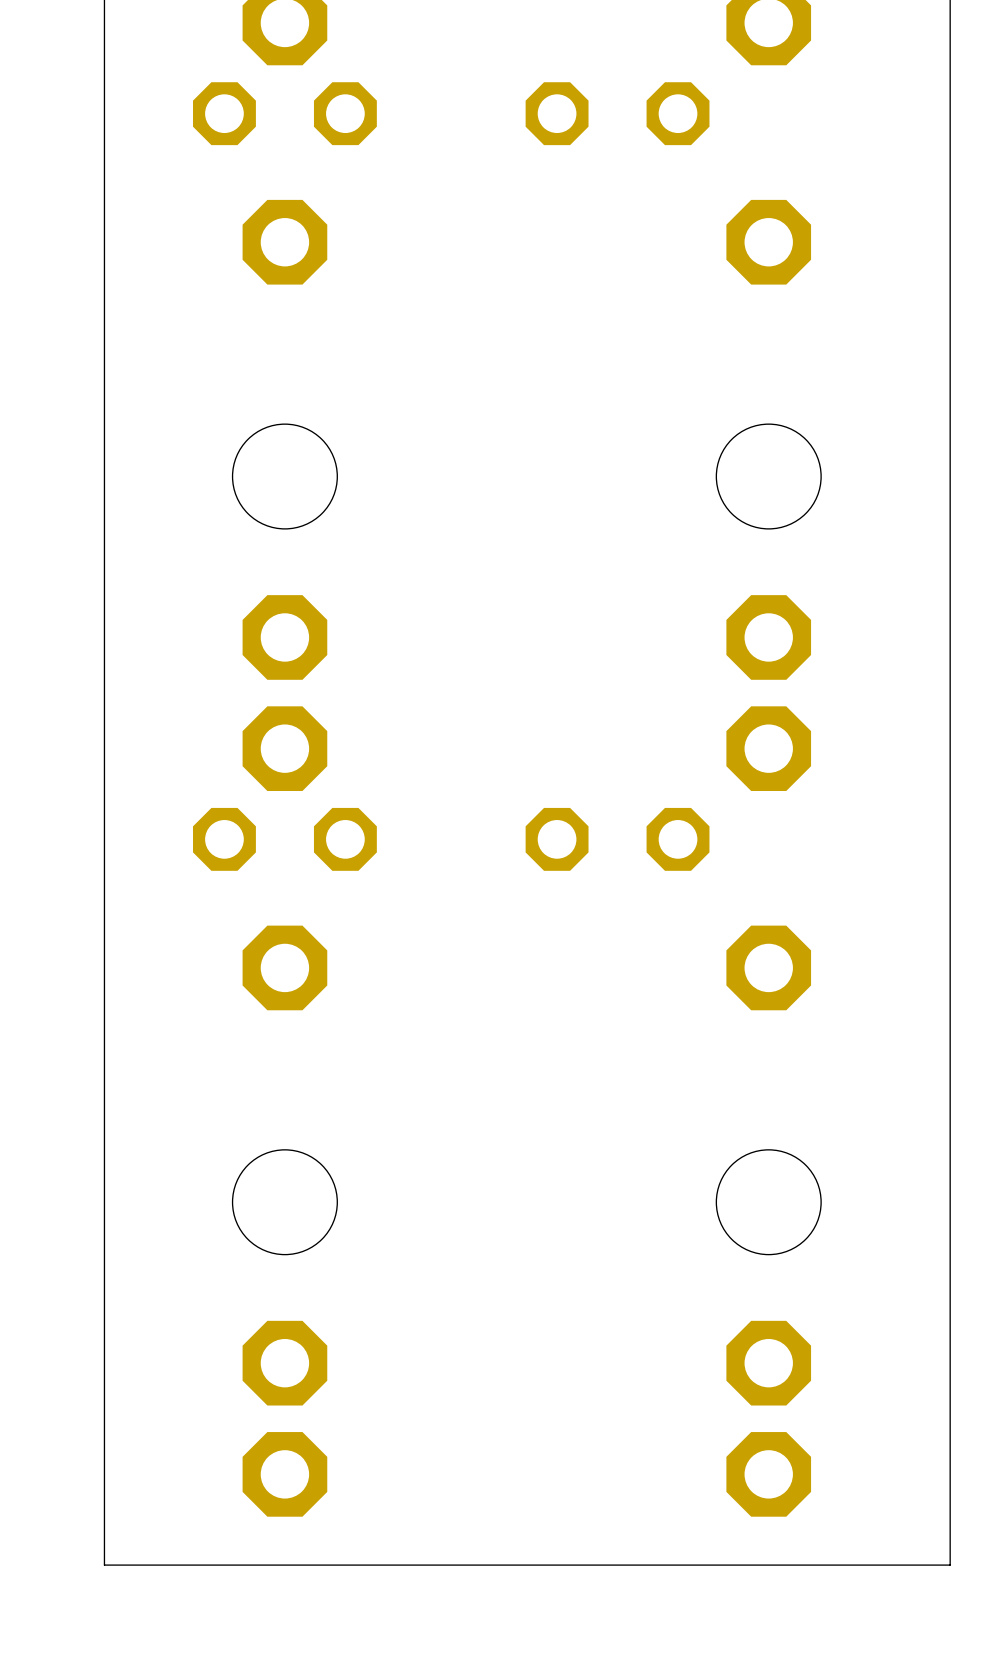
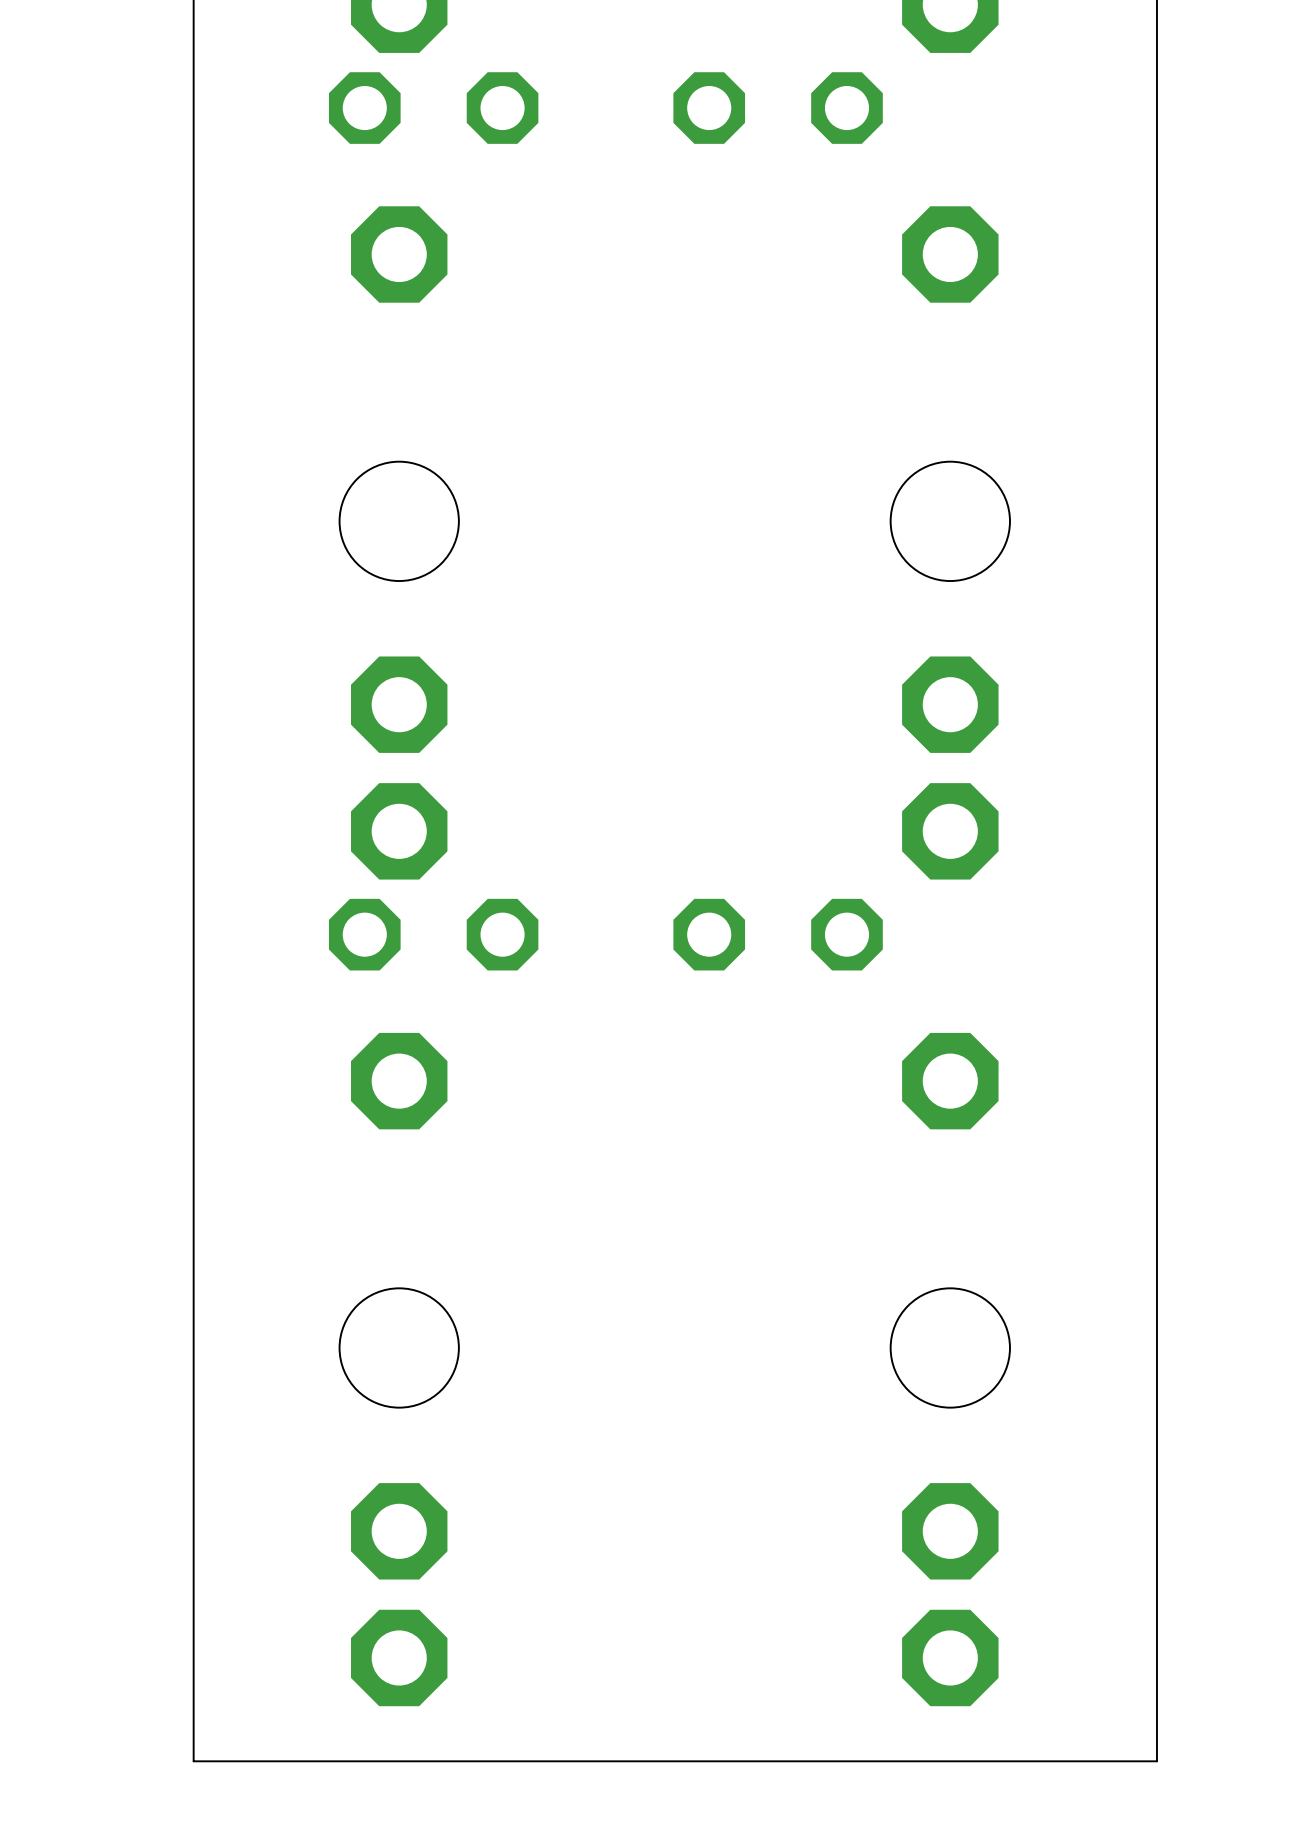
part position: (284, 113) -> (433, 108)
part position: (284, 839) -> (433, 934)

